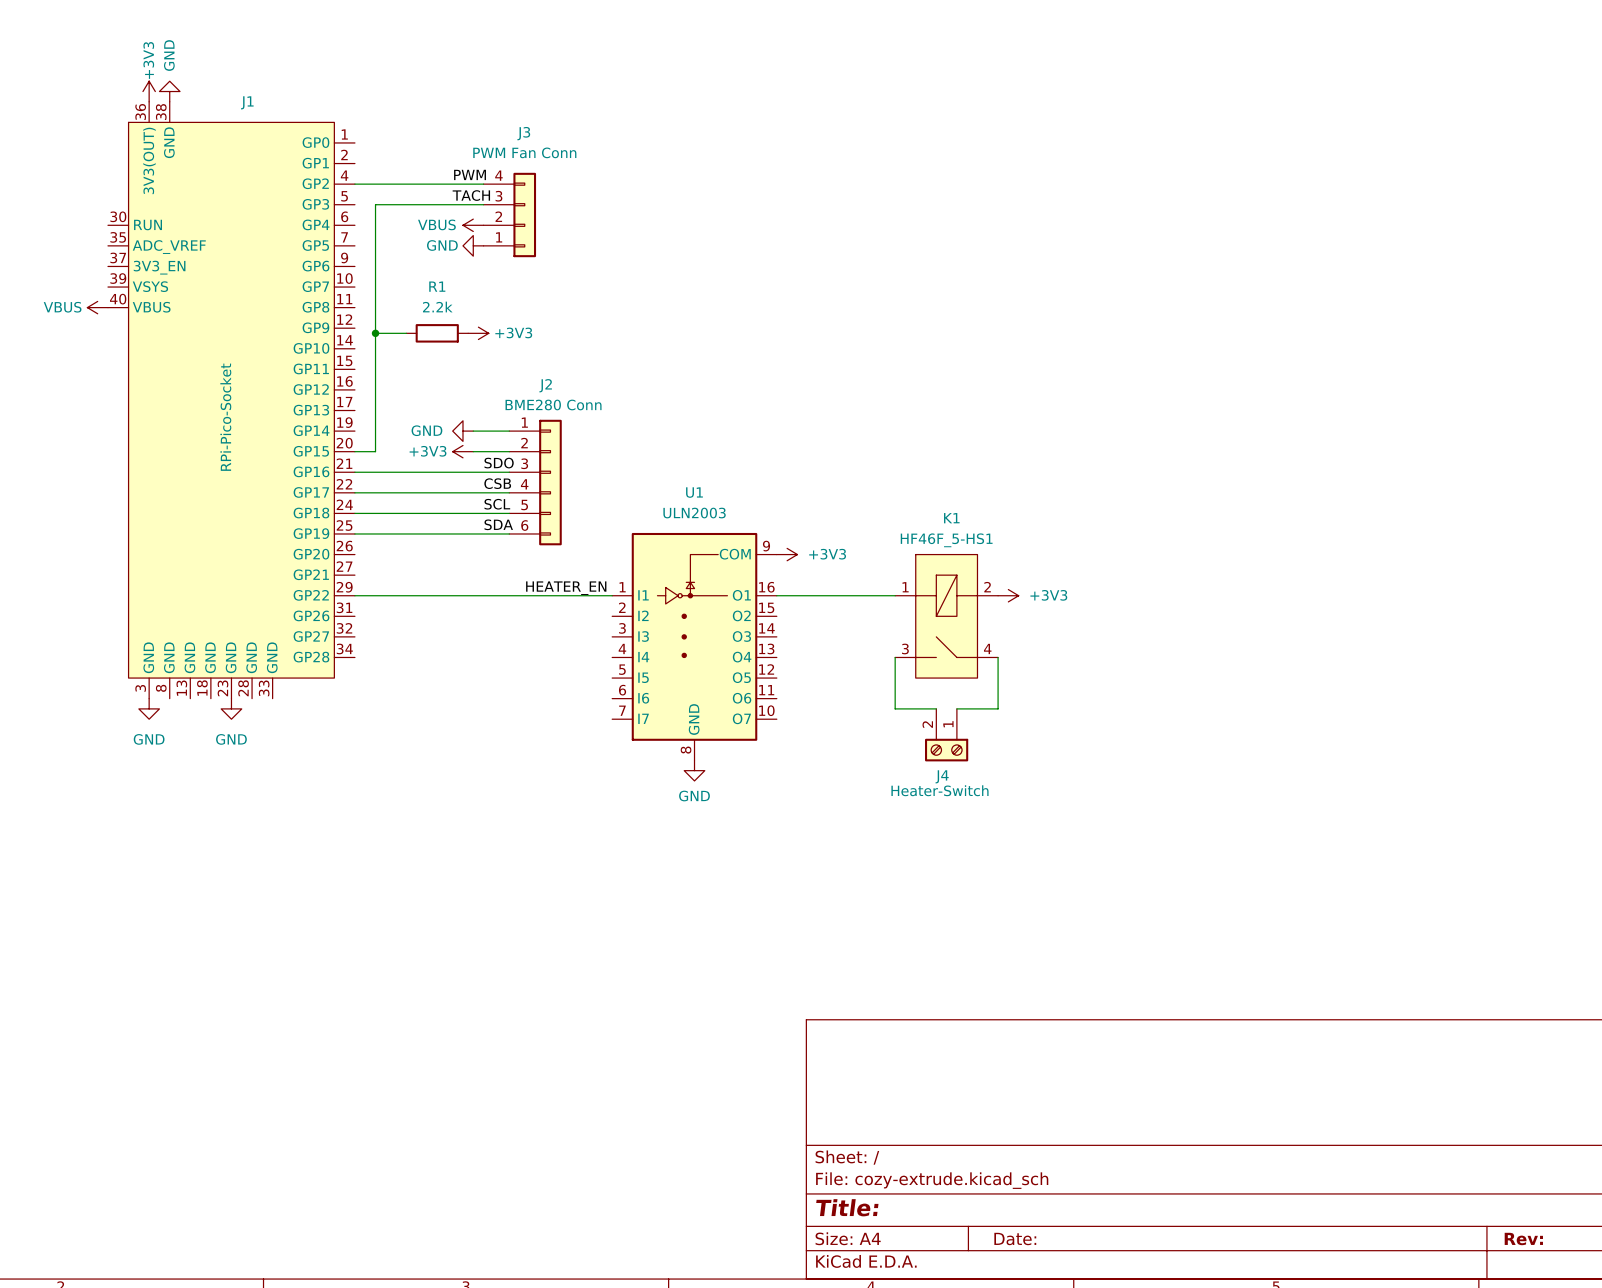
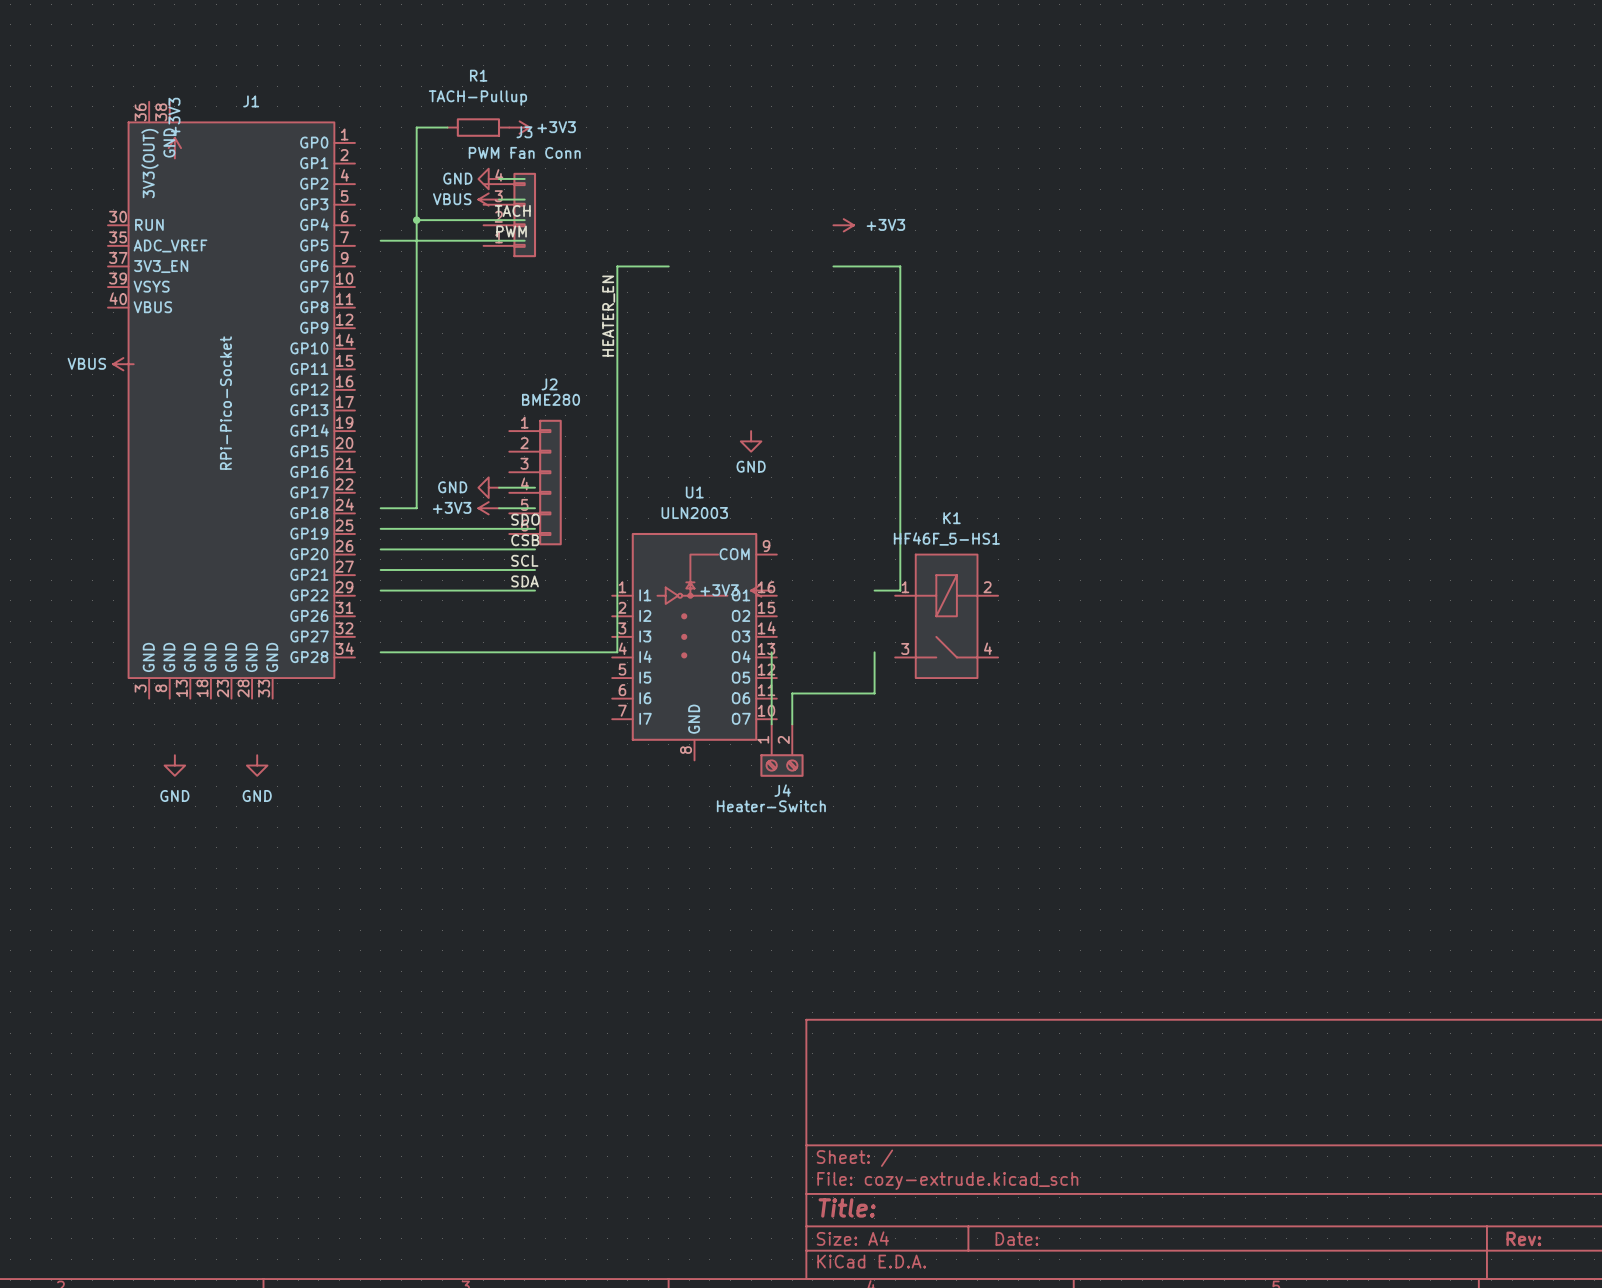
power symbol position: +3V3 (149, 91) -> +3V3 (174, 148)
power symbol: GND (169, 91) -> none
wire: none -> (447, 127) (416, 127) (416, 508) (380, 508)
power symbol: none -> +3V3 (519, 127)
label position: PWM (470, 174) -> PWM (511, 231)
wire: none -> (499, 178) (524, 178)
wire: (354, 184) (483, 184) -> none
label position: TACH (471, 195) -> TACH (512, 210)
wire: none -> (499, 199) (524, 199)
wire: (483, 204) (375, 204) (375, 451) (354, 451) -> none
wire: none -> (416, 220) (524, 220)
junction: none -> (416, 220)
power symbol position: VBUS (473, 225) -> VBUS (488, 199)
power symbol: none -> +3V3 (843, 225)
wire: none -> (380, 240) (524, 240)
power symbol position: GND (473, 245) -> GND (488, 178)
wire: none -> (668, 266) (617, 266) (617, 652) (380, 652)
wire: none -> (833, 266) (900, 266) (900, 590) (874, 590)
R1 name position: R1 (437, 286) -> R1 (478, 75)
power symbol position: VBUS (97, 307) -> VBUS (123, 364)
R1 value: 2.2k (437, 307) -> TACH-Pullup (477, 97)
label: none -> HEATER_EN (608, 316)
wire: (375, 333) (406, 333) -> none
junction: (375, 333) -> none
R1 position: (437, 333) -> (478, 127)
power symbol: +3V3 (478, 333) -> none
J2 value: BME280 Conn (553, 404) -> BME280 (551, 399)
power symbol position: GND (462, 431) -> GND (488, 487)
wire: (473, 431) (509, 431) -> (499, 487) (535, 487)
power symbol: none -> GND (751, 441)
power symbol position: +3V3 (462, 451) -> +3V3 (488, 508)
wire: (473, 451) (509, 451) -> (499, 508) (535, 508)
label position: SDO (499, 463) -> SDO (525, 519)
wire: (354, 472) (509, 472) -> (380, 528) (535, 528)
label position: CSB (497, 483) -> CSB (525, 540)
wire: (354, 492) (509, 492) -> (380, 549) (535, 549)
label position: SCL (497, 504) -> SCL (524, 560)
wire: (354, 513) (509, 513) -> (380, 570) (535, 570)
label position: SDA (498, 524) -> SDA (525, 581)
wire: (354, 533) (509, 533) -> (380, 590) (535, 590)
power symbol rotation: 0° (787, 554) -> 180° (761, 590)
power symbol position: +3V3 (787, 554) -> +3V3 (761, 590)
label: HEATER_EN (566, 588) -> none
wire: (354, 595) (612, 595) -> none
wire: (776, 595) (895, 595) -> none
power symbol: +3V3 (1008, 595) -> none
wire: none -> (771, 652) (771, 724)
wire: none -> (874, 652) (874, 693) (792, 693) (792, 724)
wire: (895, 657) (895, 708) (936, 708) -> none
wire: (998, 657) (998, 708) (956, 708) -> none
power symbol: GND (149, 708) -> none
power symbol: GND (231, 708) -> none
J4 position: (946, 735) -> (781, 750)
J4 flip: as is (946, 750) -> left-right (781, 765)
power symbol: none -> GND (174, 765)
power symbol: none -> GND (257, 765)
power symbol: GND (694, 770) -> none

